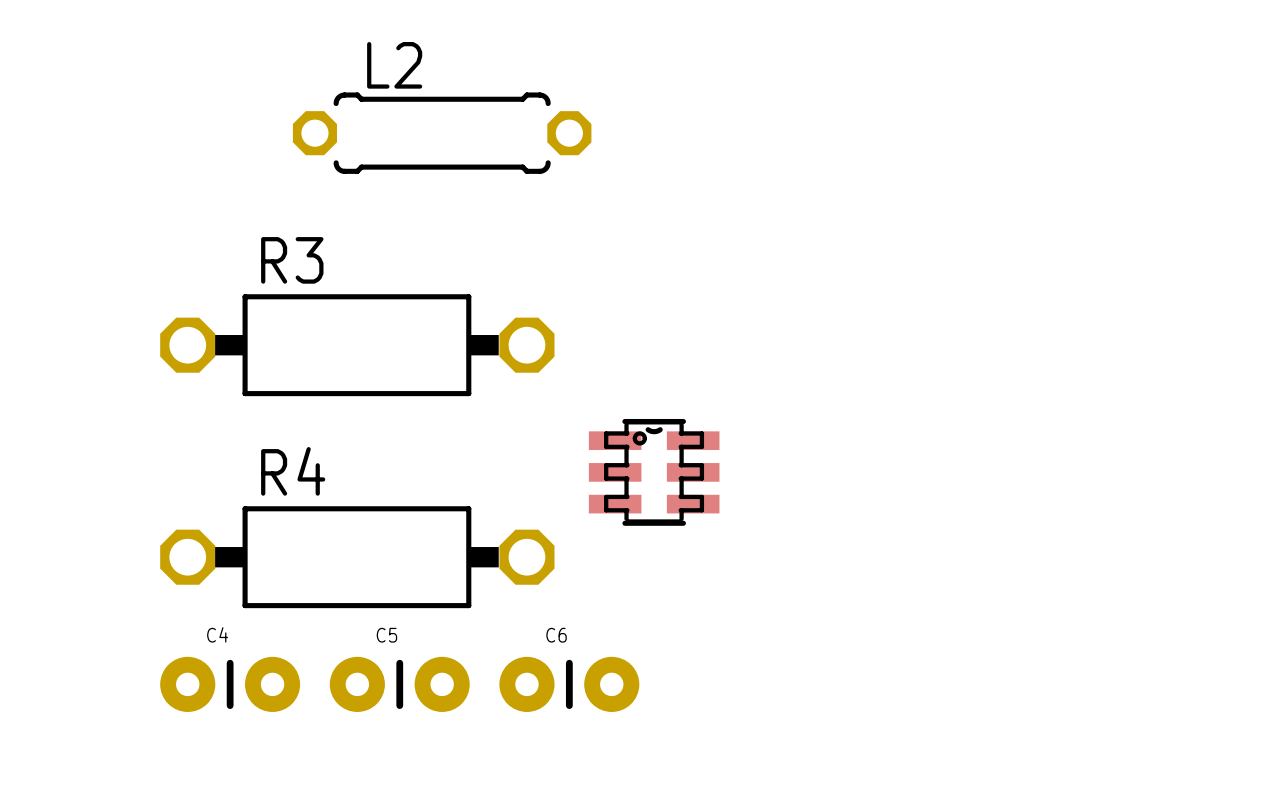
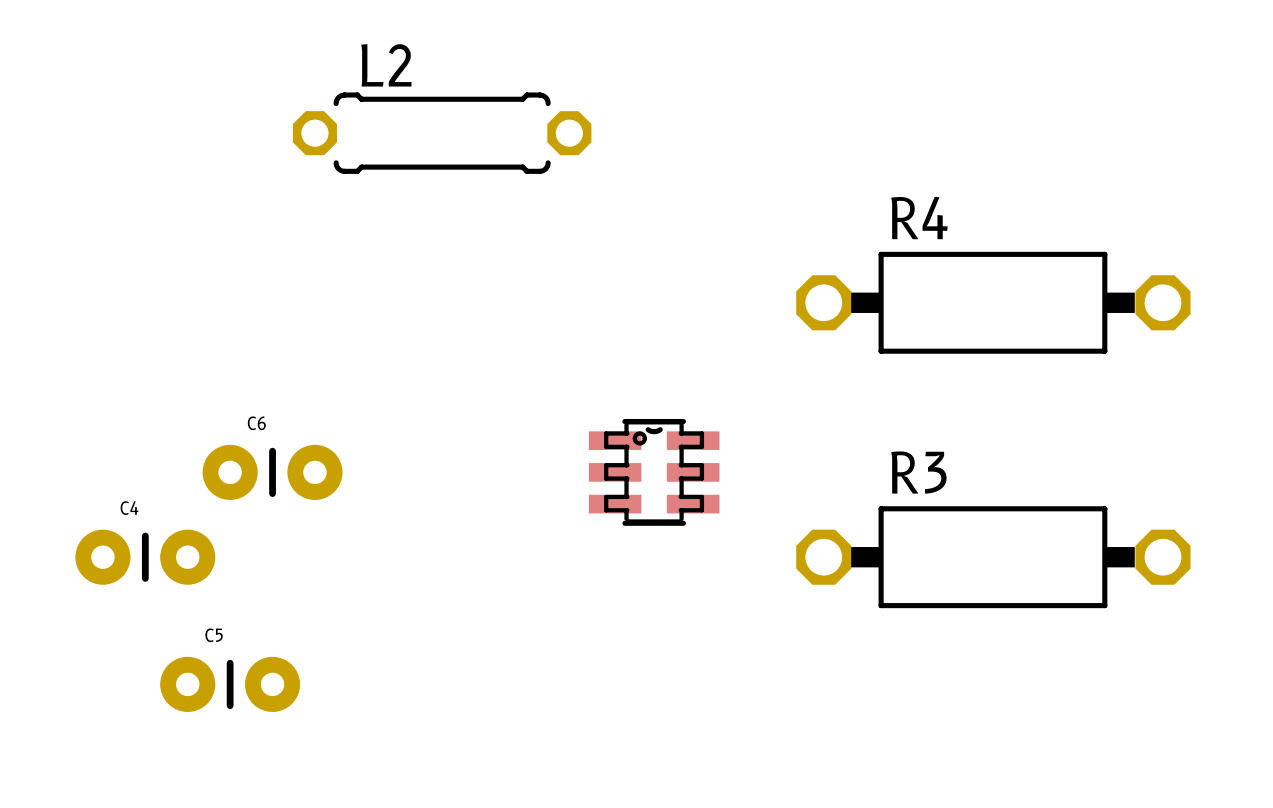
R3 position: (357, 345) -> (993, 557)
C4: none -> (145, 557)
R4 position: (357, 557) -> (993, 302)
C4 name: C4 (217, 634) -> C5 (214, 635)
C5: (399, 684) -> none
C6 position: (569, 684) -> (272, 472)

